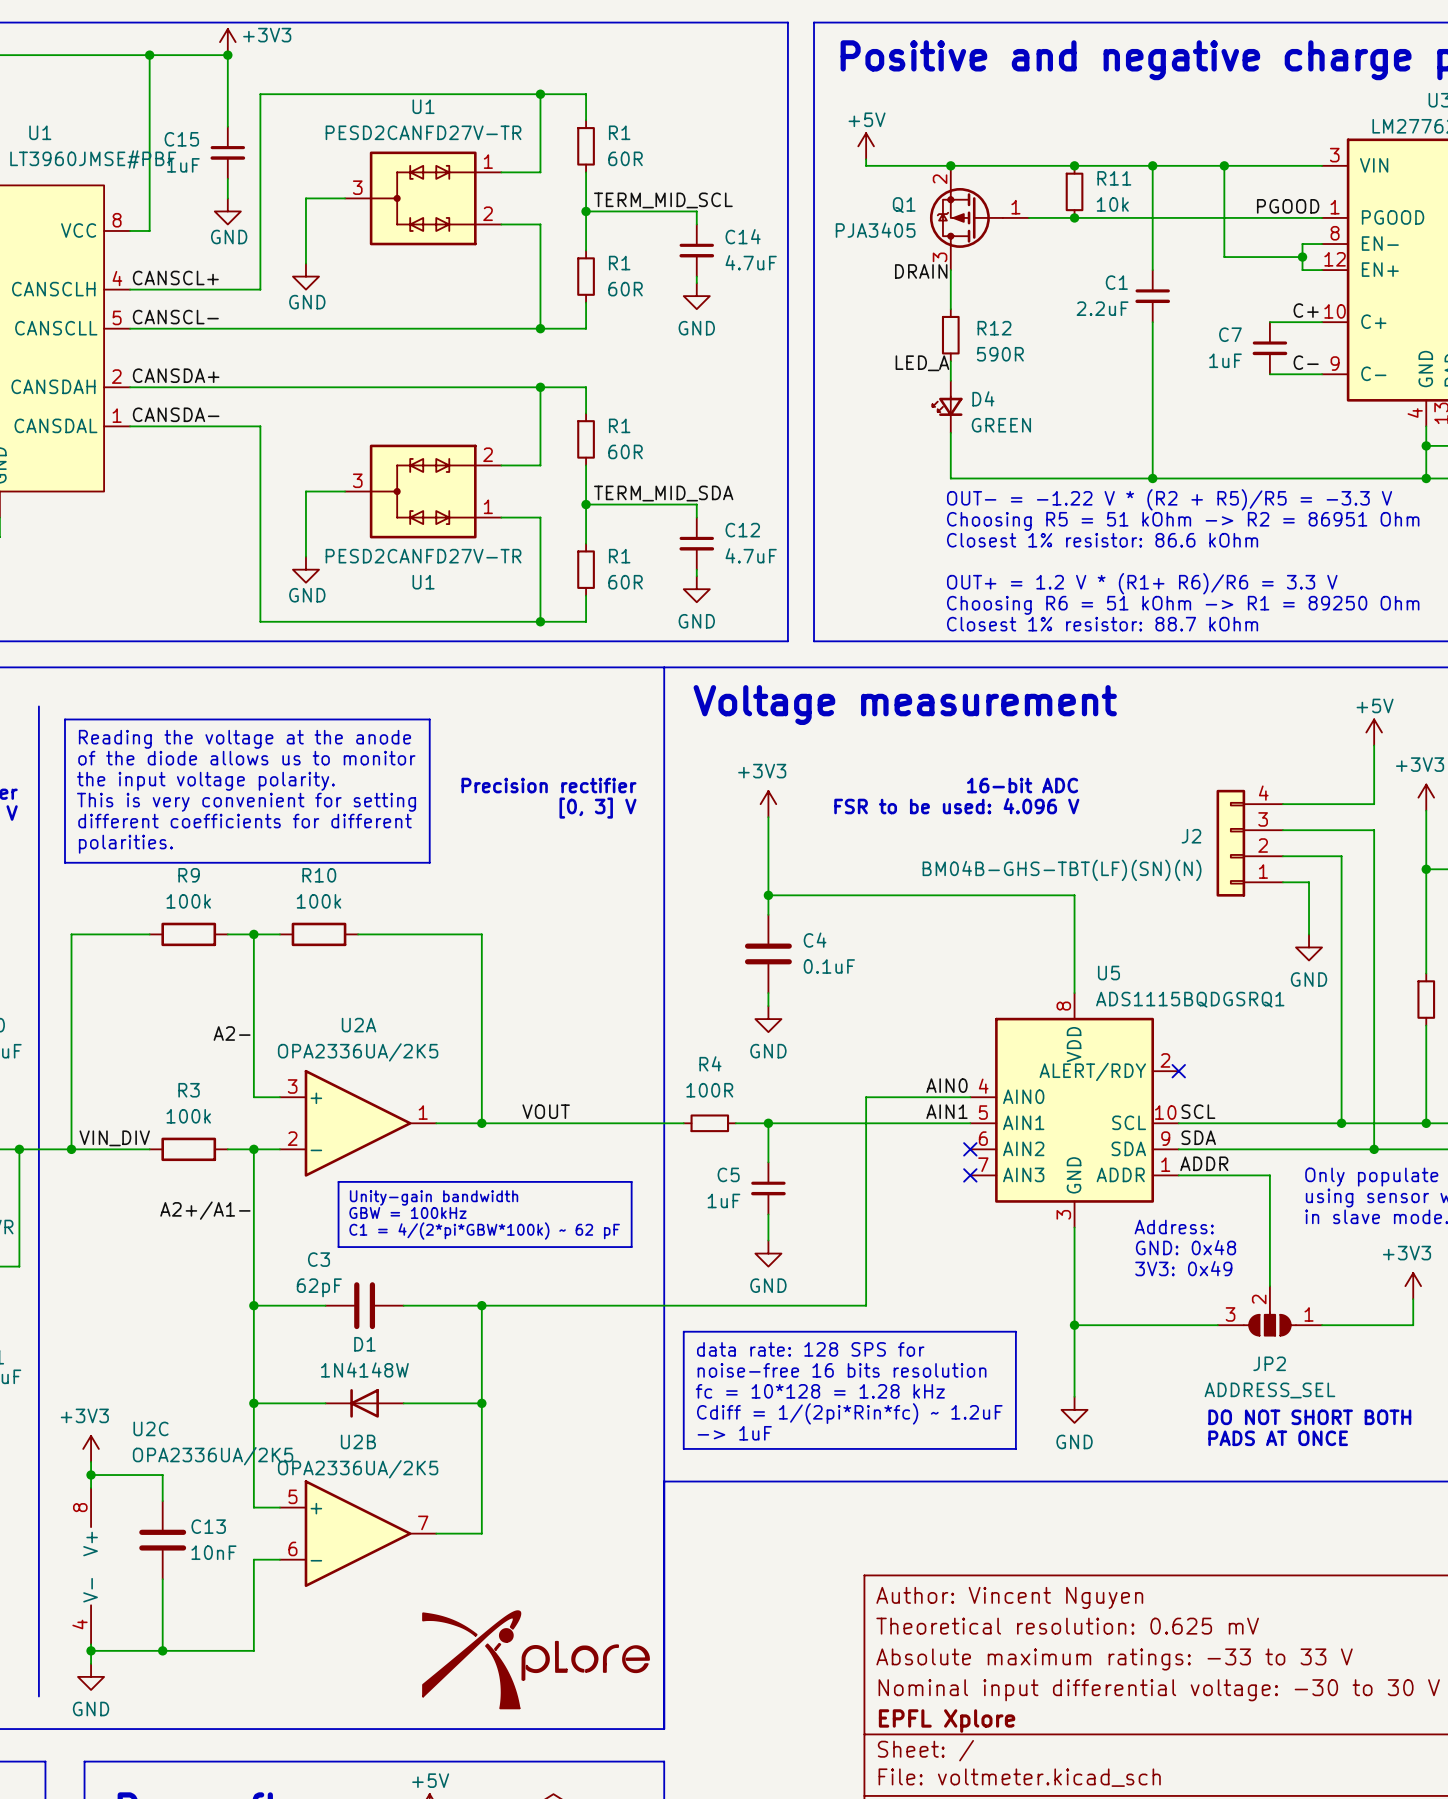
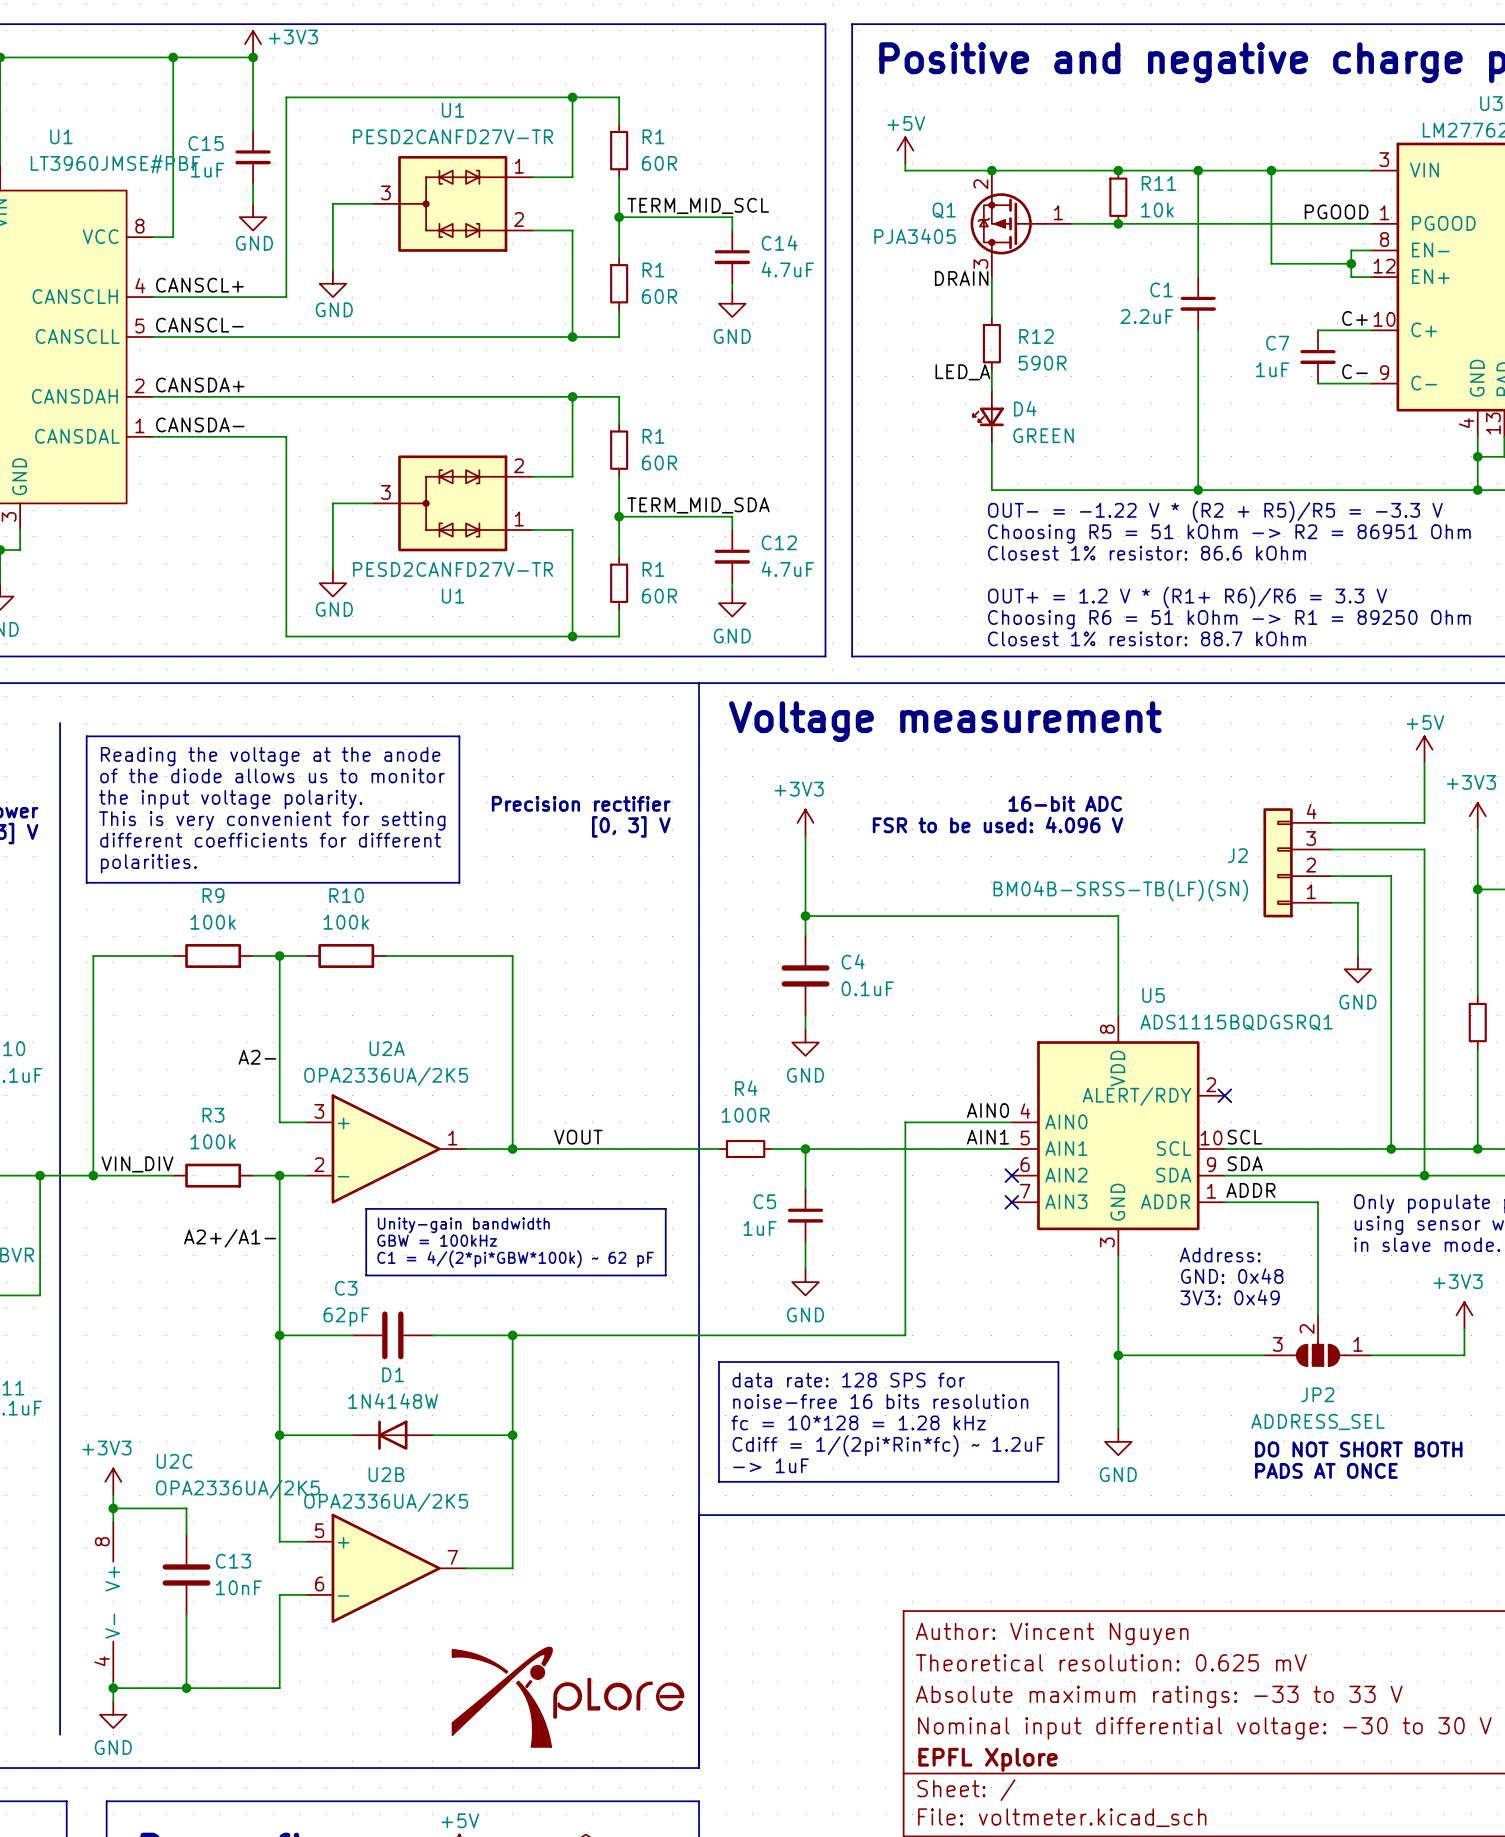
J2 value: BM04B-GHS-TBT(LF)(SN)(N) (1062, 870) -> BM04B-SRSS-TB(LF)(SN) (1120, 890)

